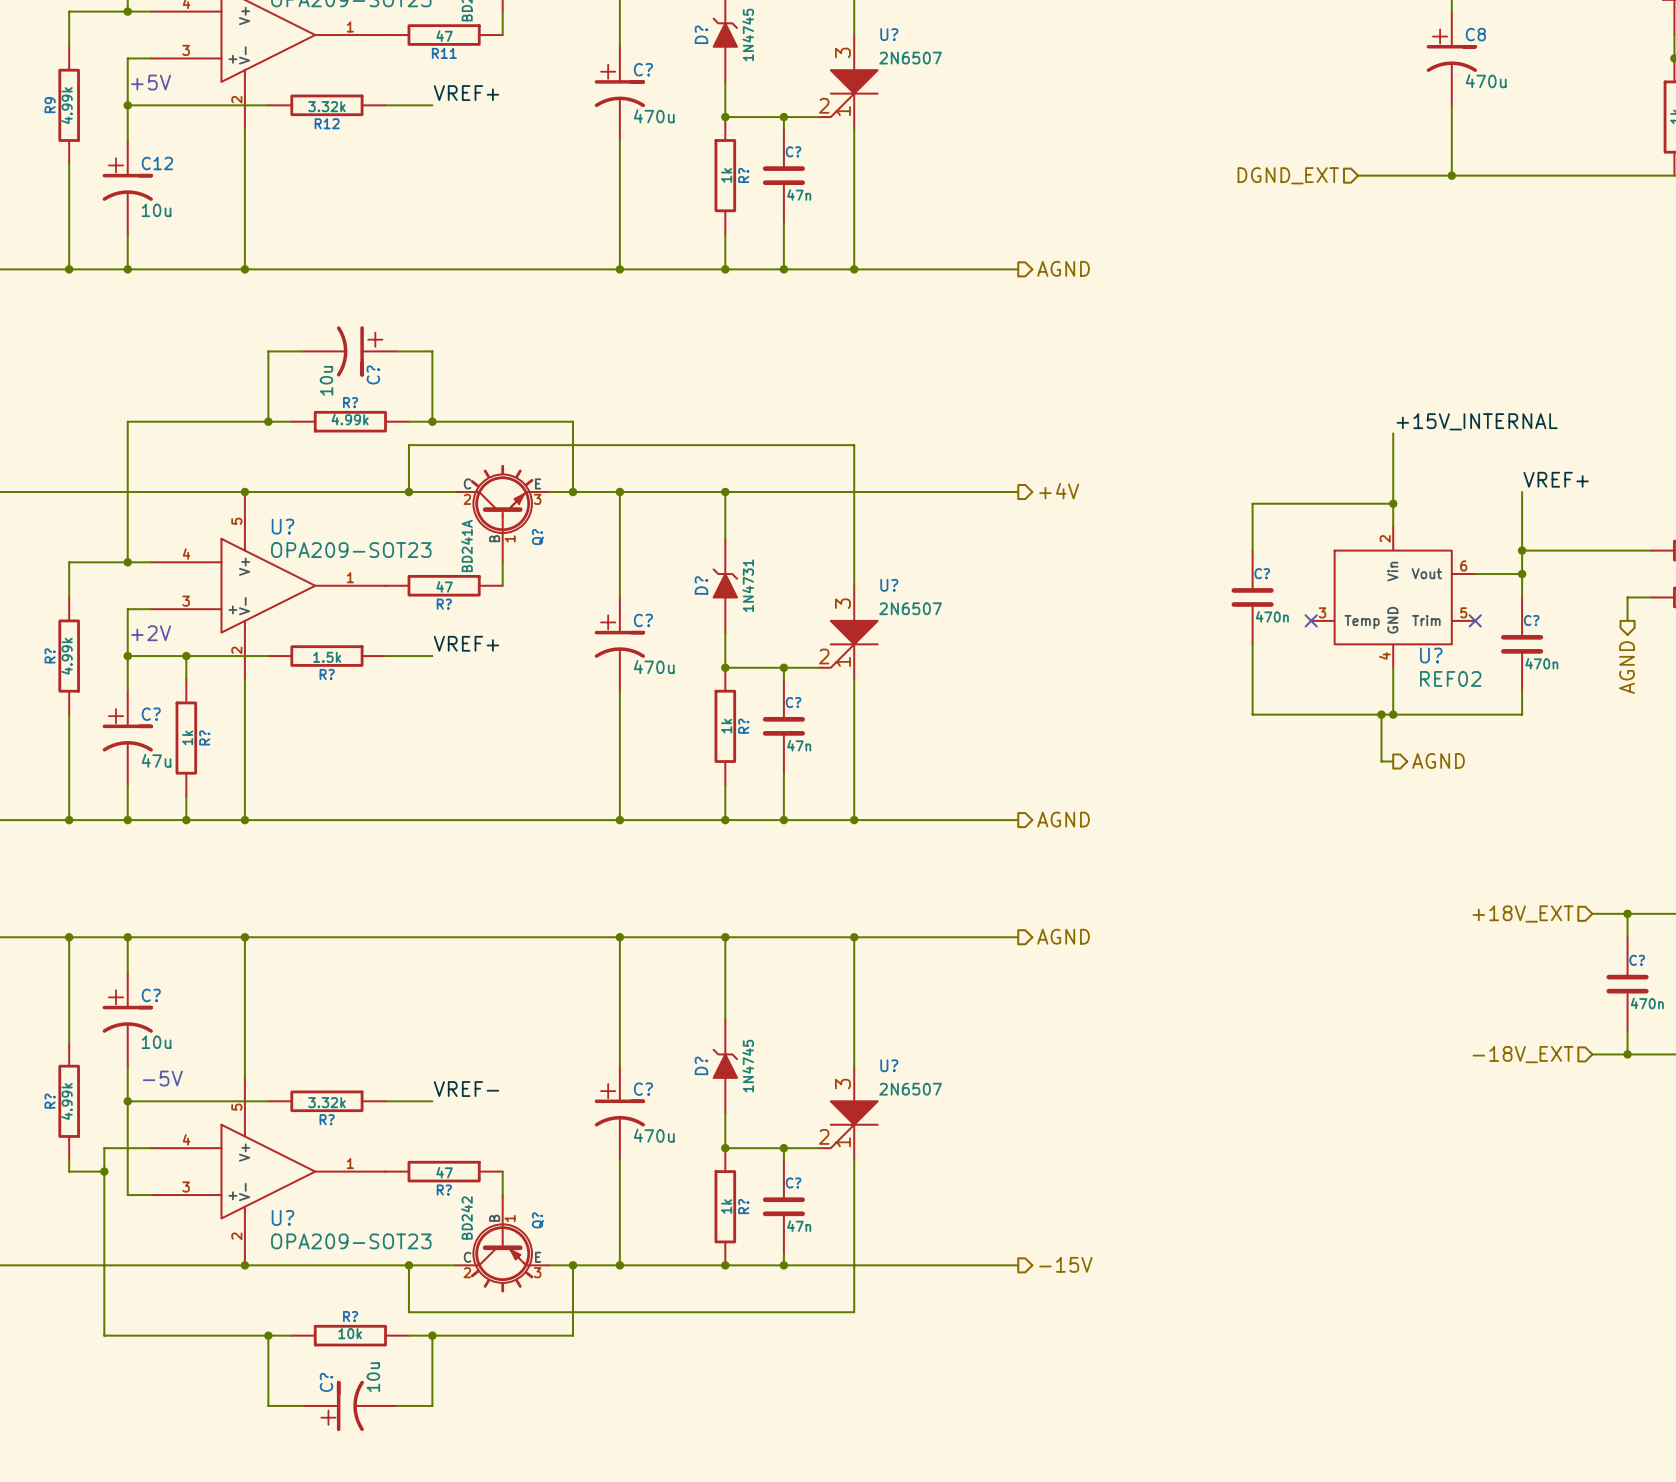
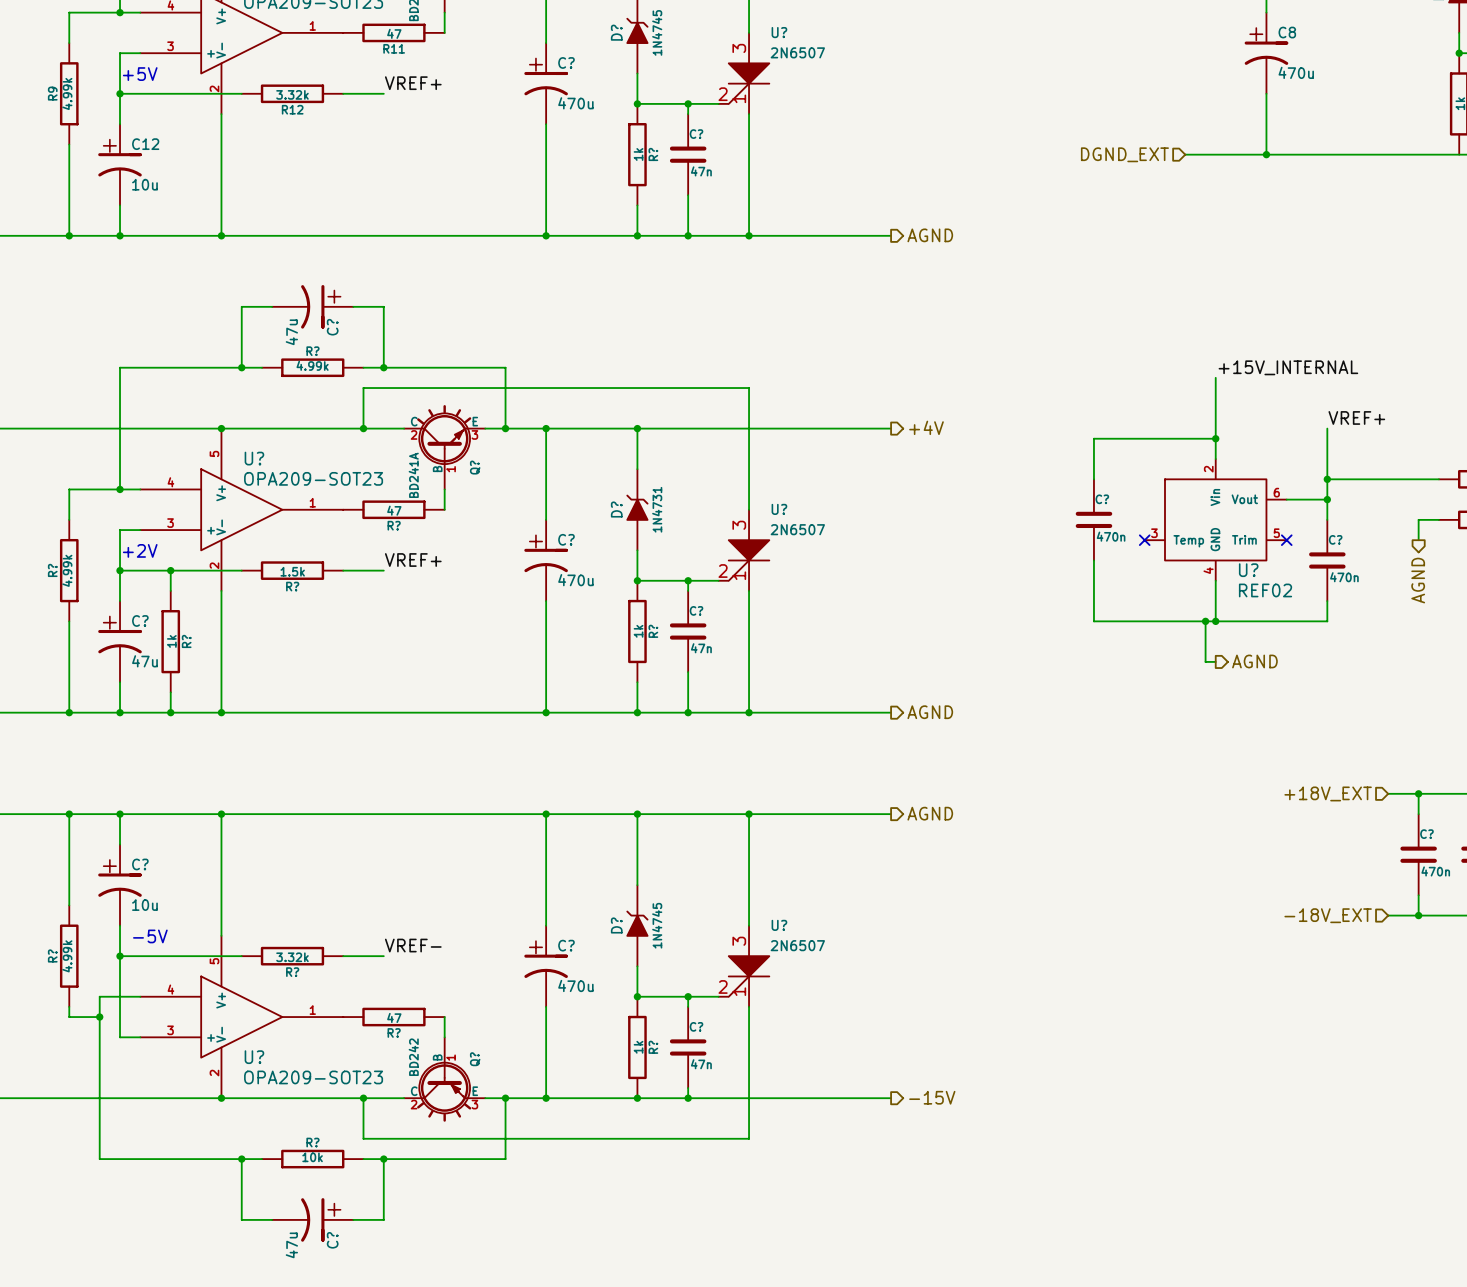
C? value: 10u (326, 380) -> 47u (291, 332)
C? value: 10u (373, 1377) -> 47u (291, 1245)
C? rotation: 0° (350, 1405) -> 180° (312, 1219)

